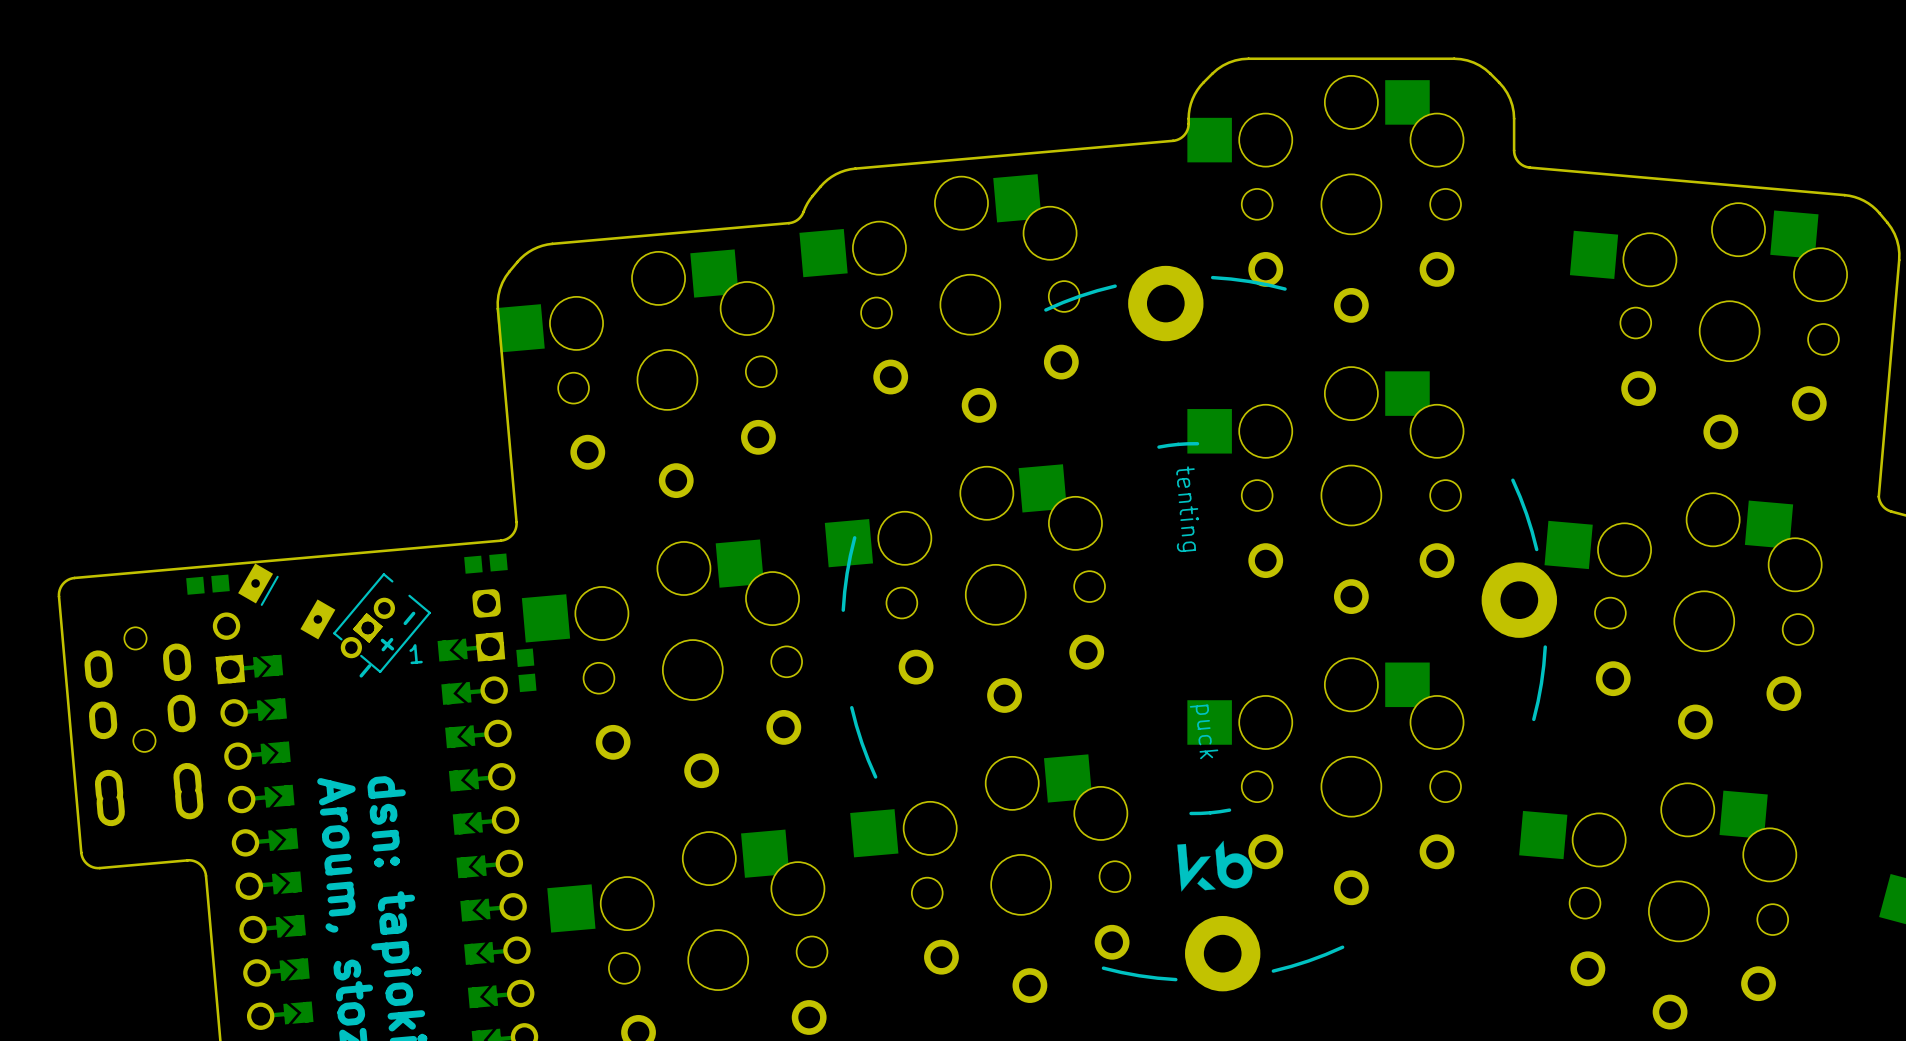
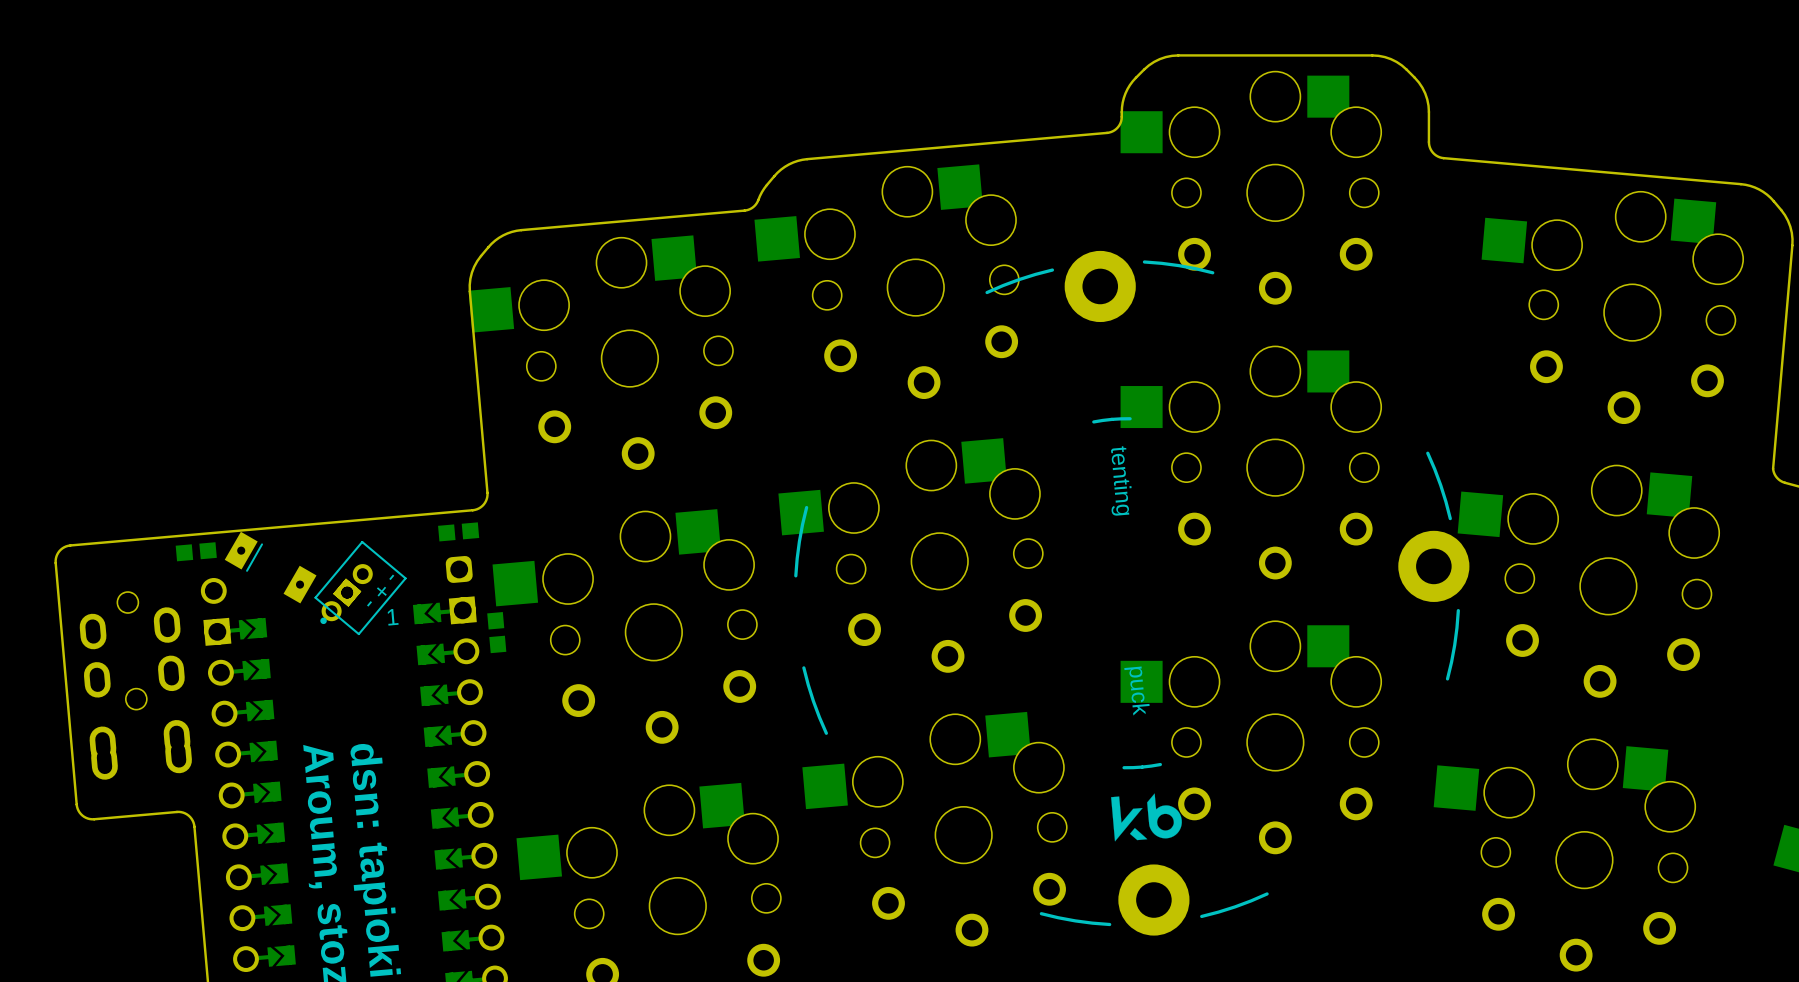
part footprint: [333, 573, 431, 673] -> [314, 540, 407, 636]

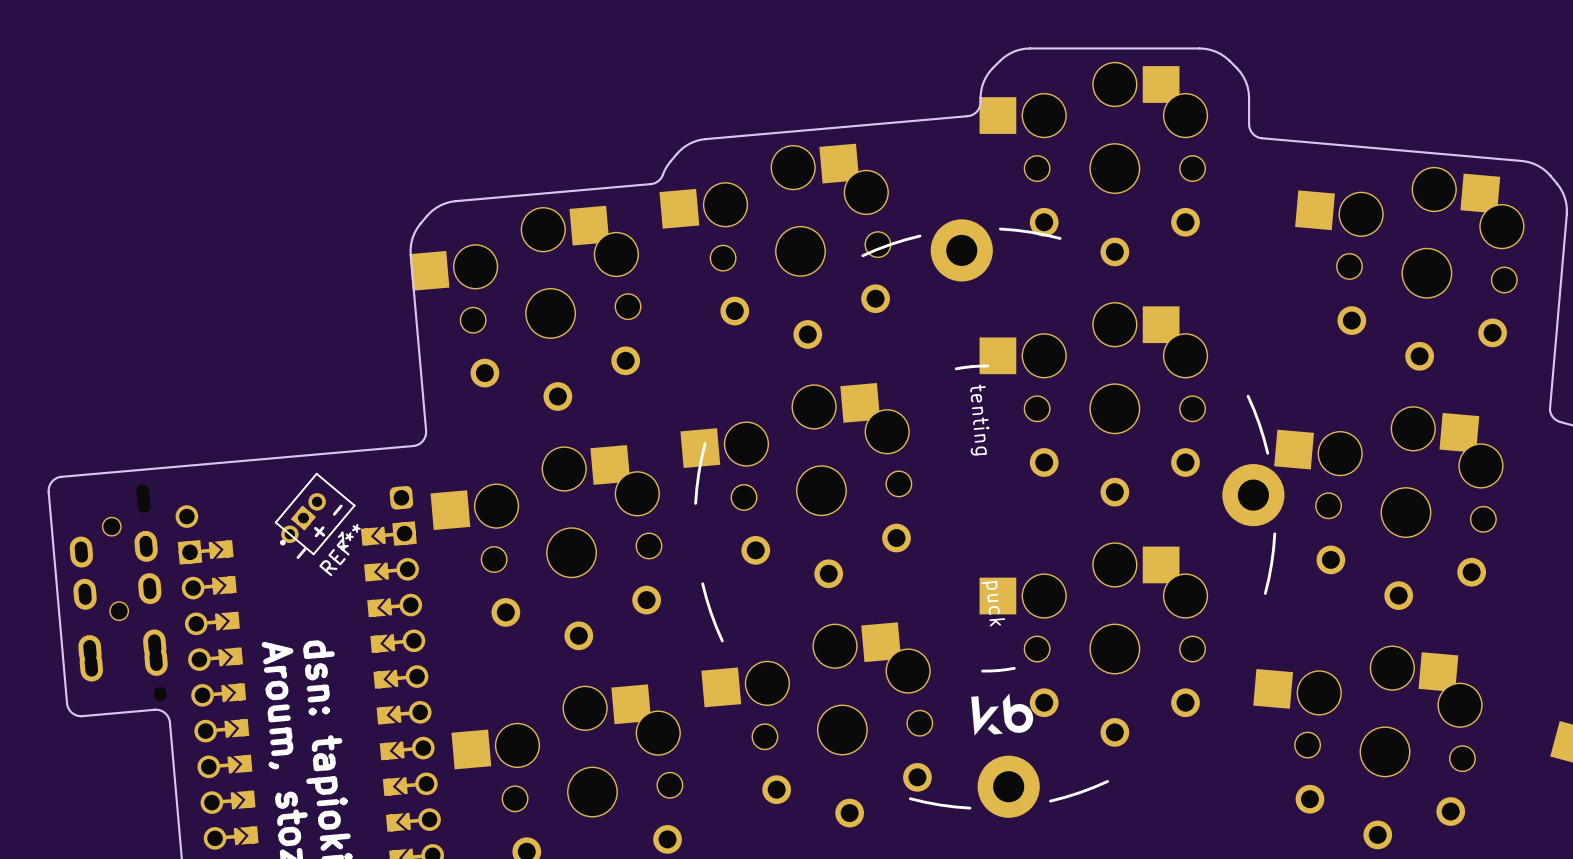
part: (458, 531) -> none
line: (262, 544) (247, 570) -> none
part: (196, 551) -> none
part: (270, 567) -> none
REF** name: none -> REF** (340, 550)
part: (496, 632) -> none

